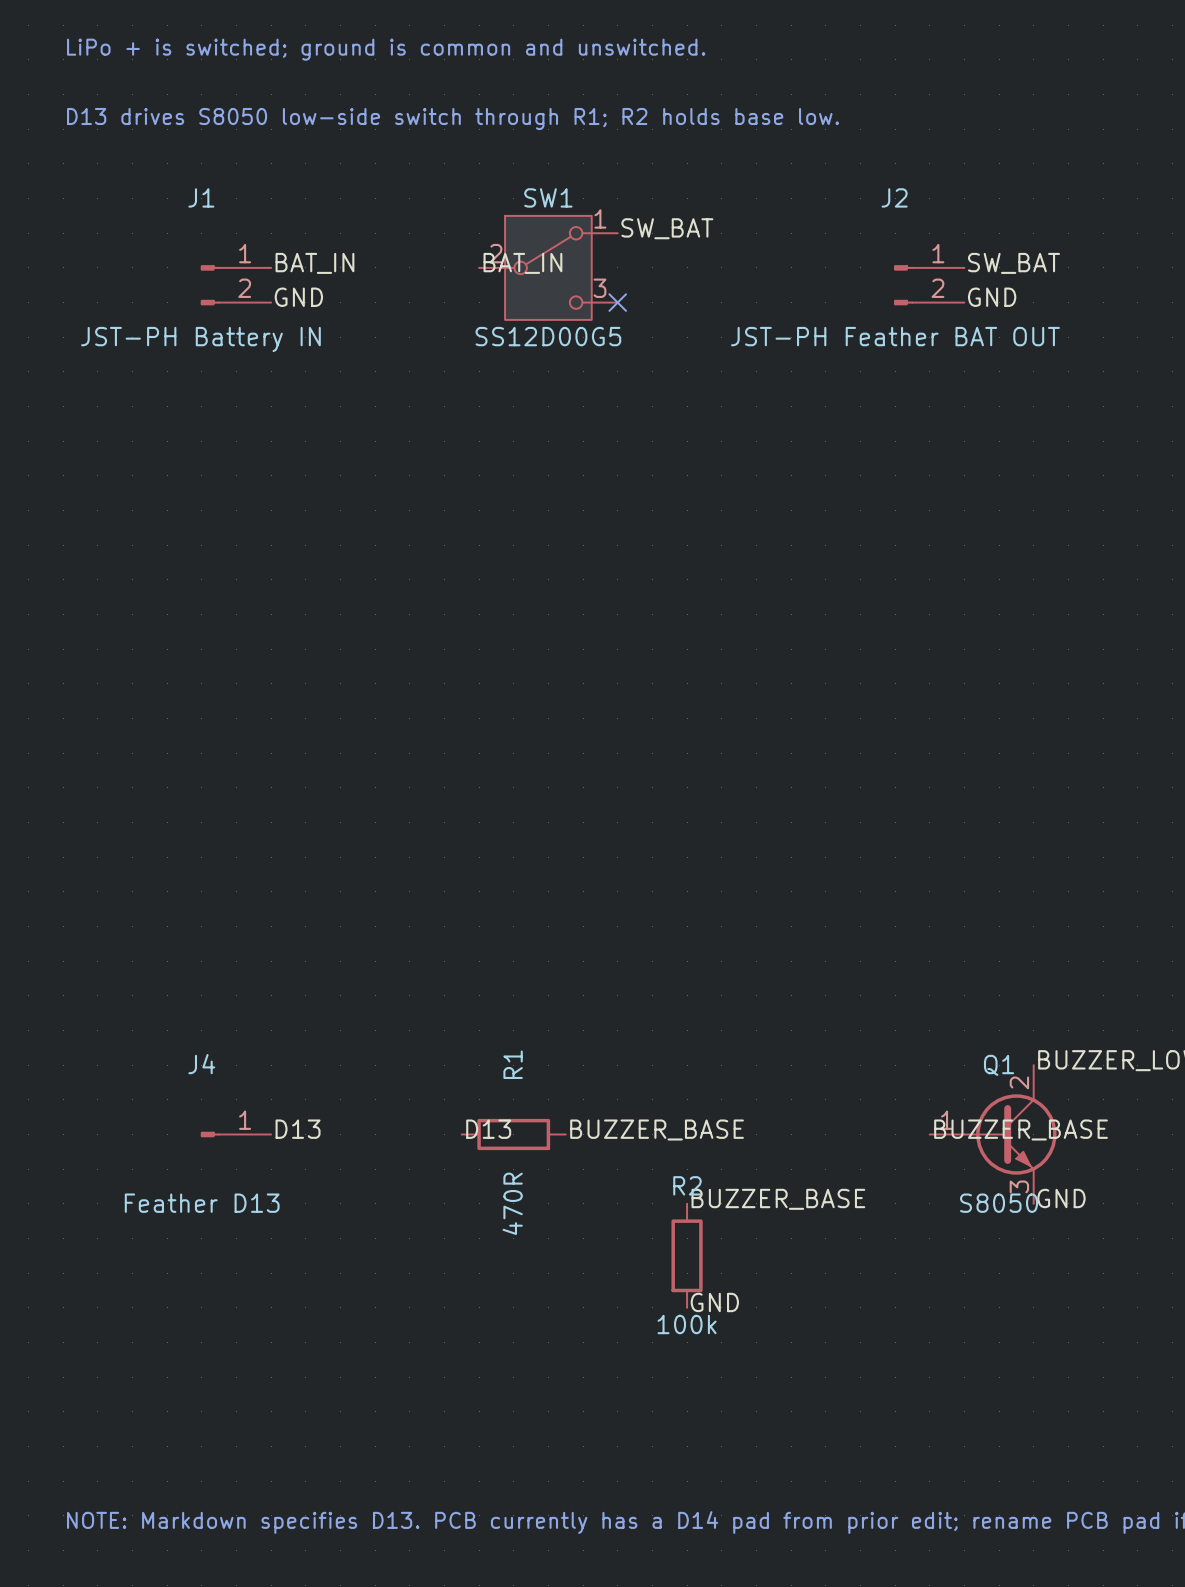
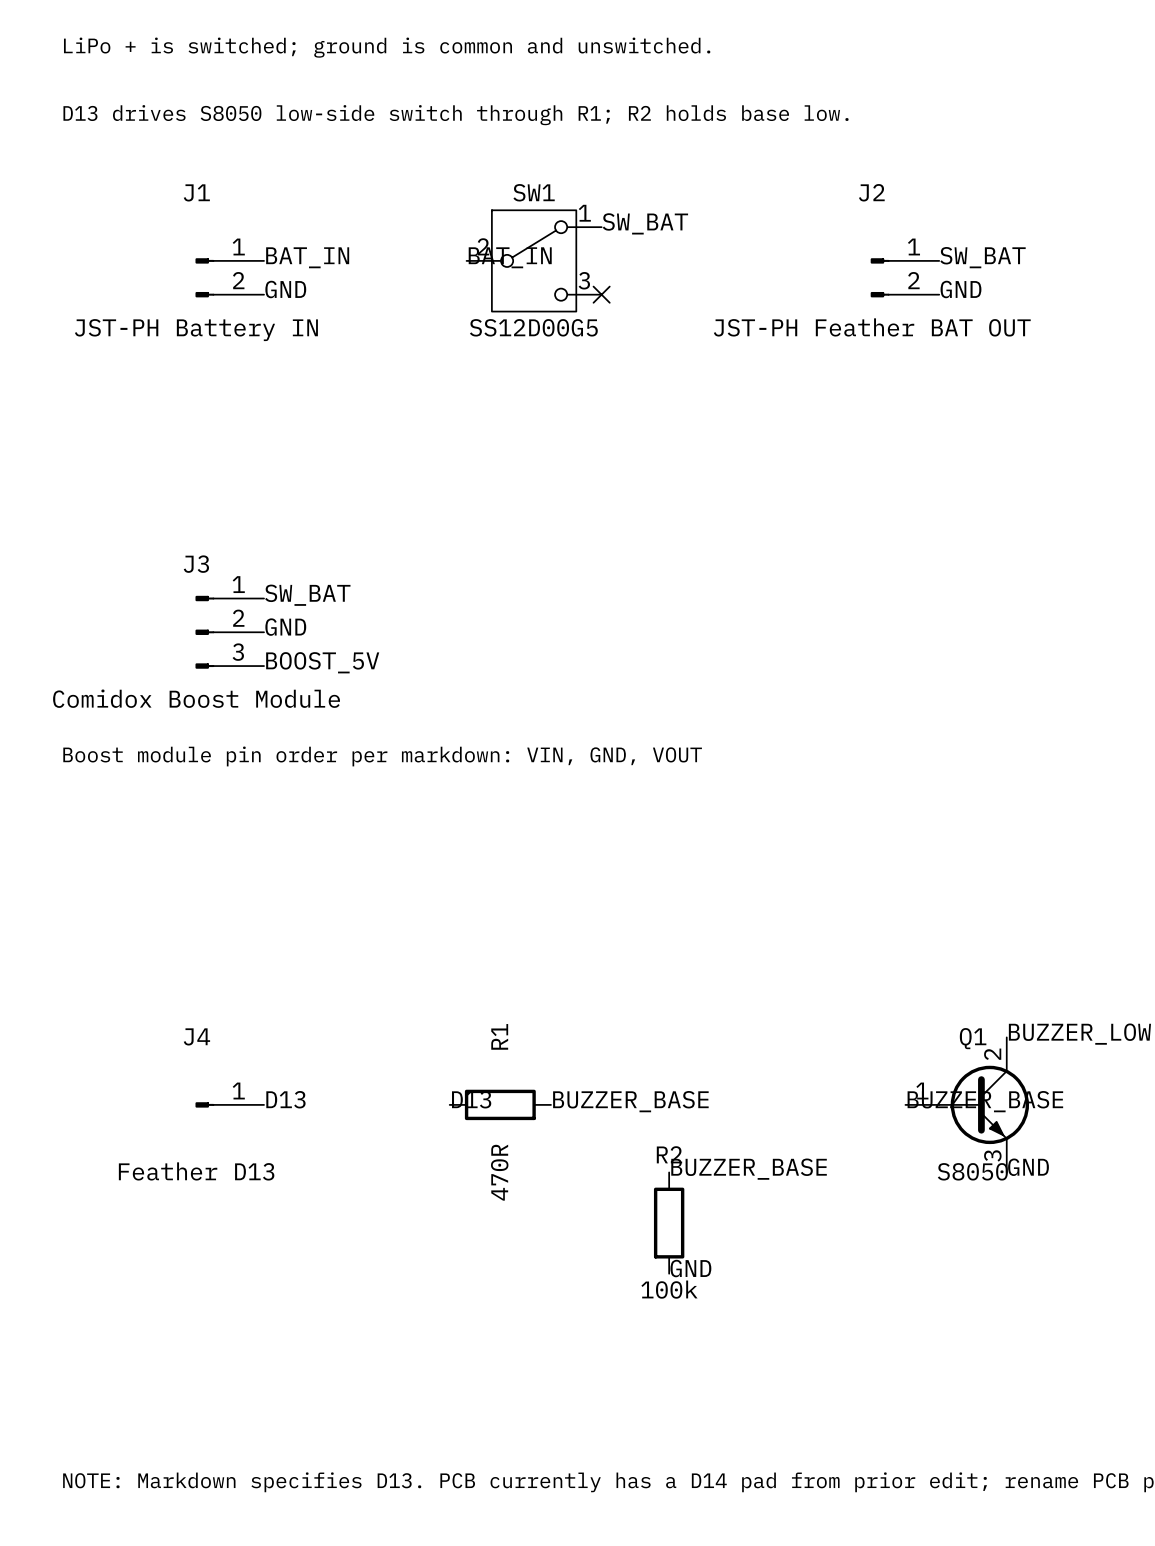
label: none -> SW_BAT (307, 595)
label: none -> GND (285, 627)
J3: none -> Comidox Boost Module (229, 632)
label: none -> BOOST_5V (322, 662)
text: none -> Boost module pin order per markdown: VIN, GND, VOUT (382, 756)

